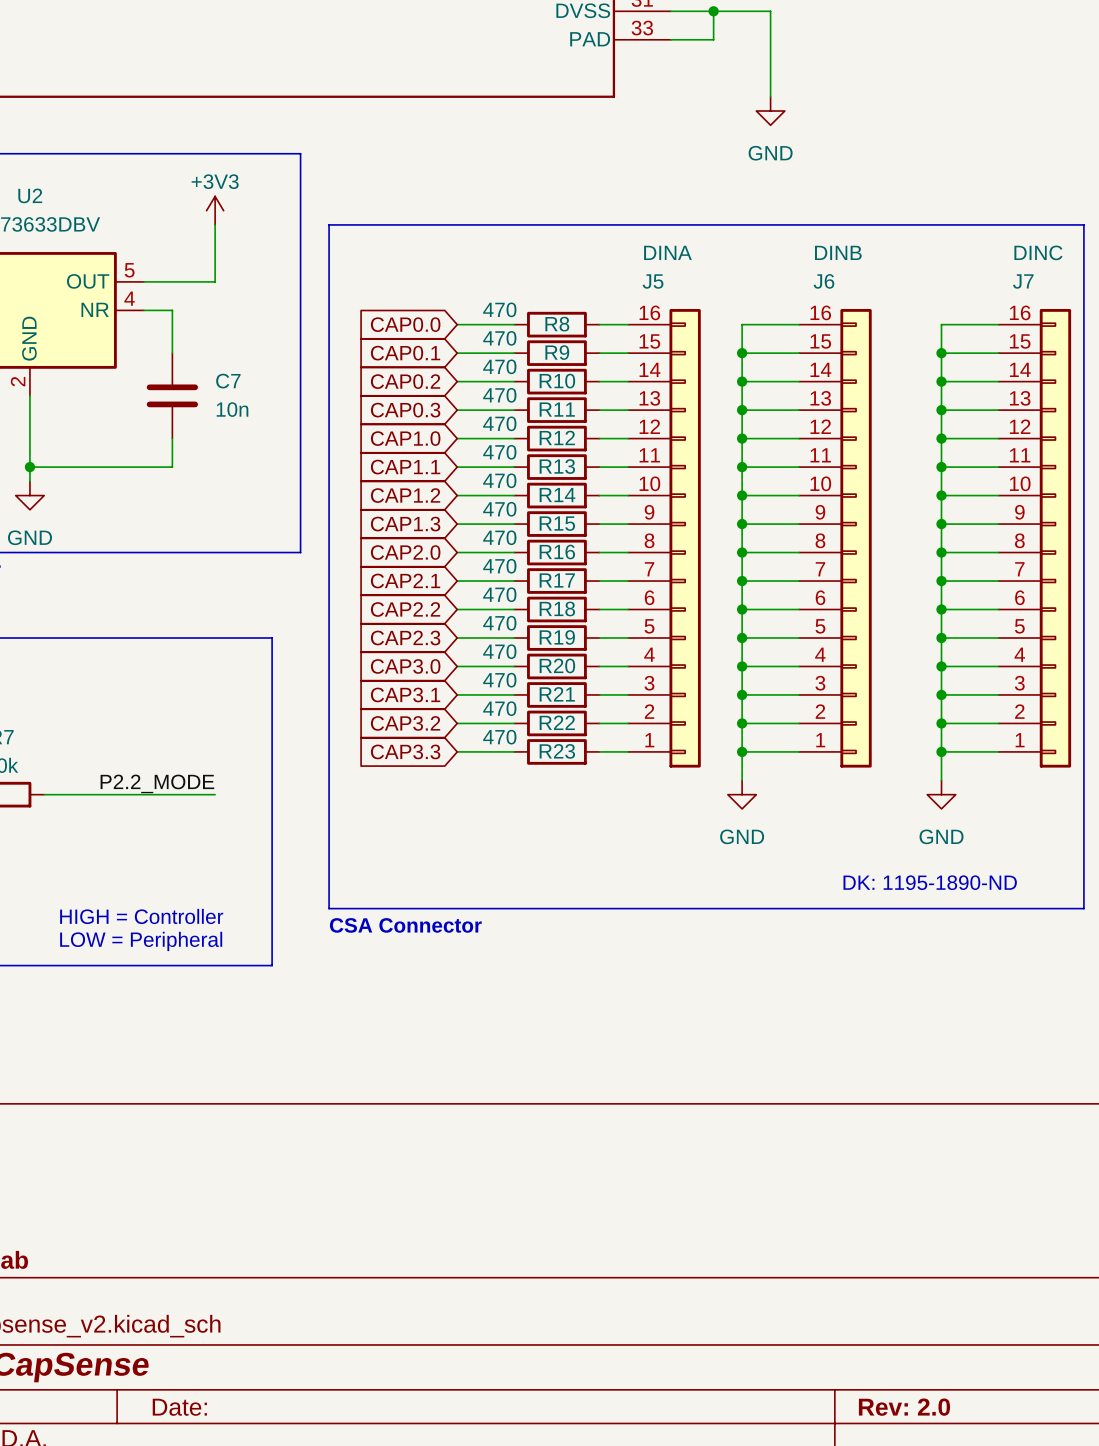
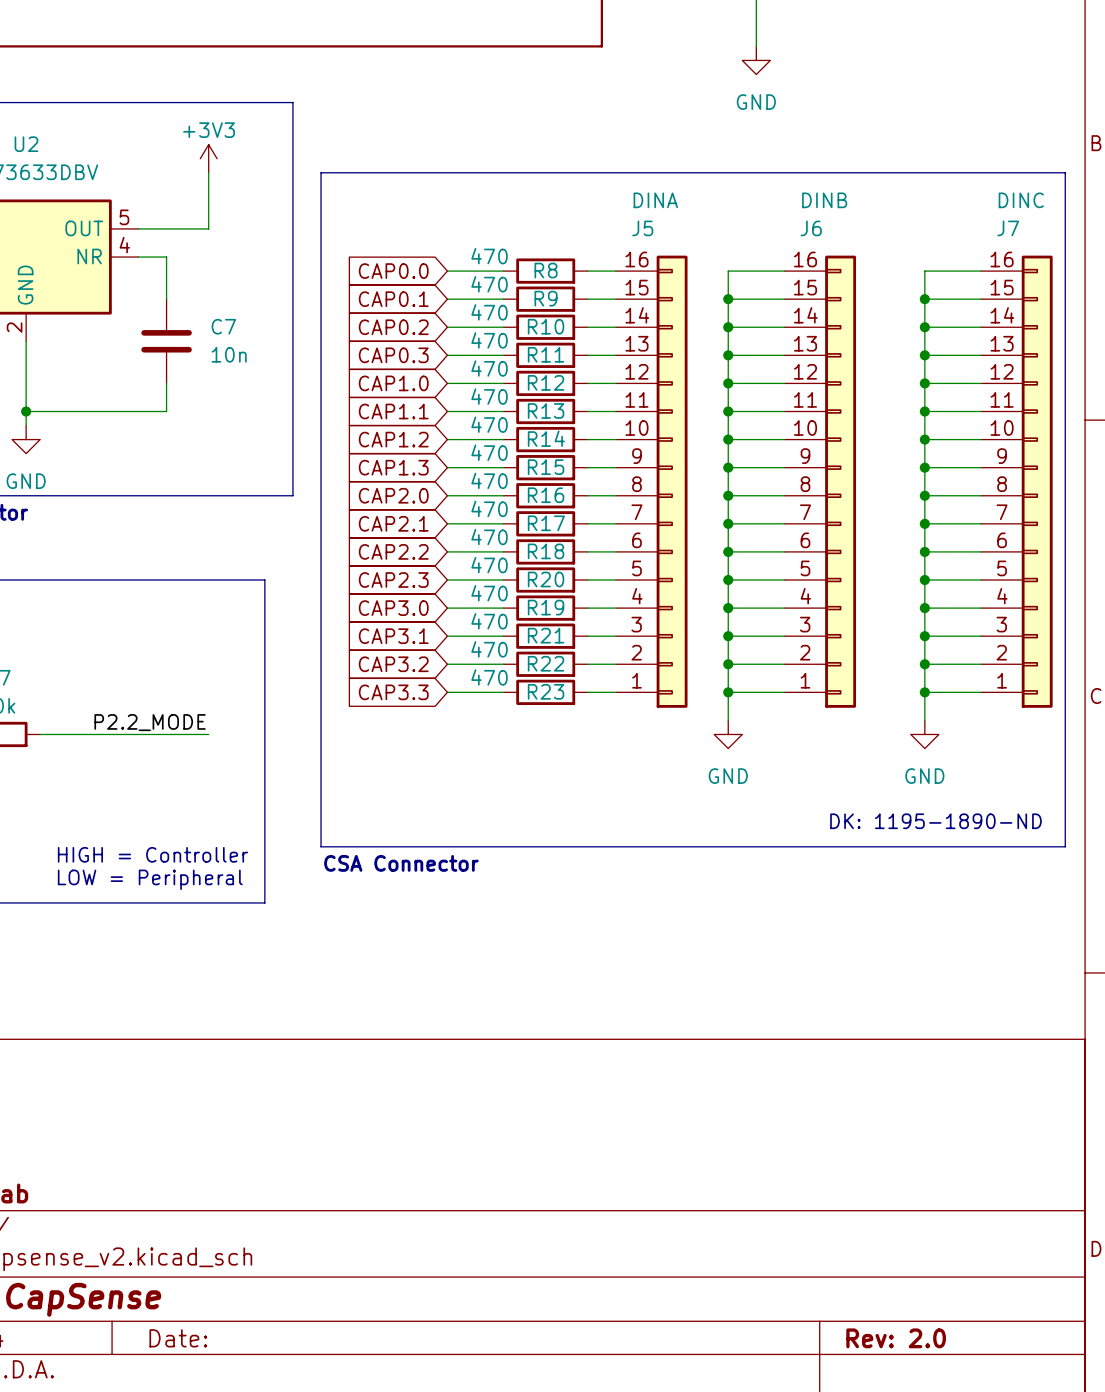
R19 name: R19 (557, 637) -> R20 (546, 579)
R20 name: R20 (557, 665) -> R19 (546, 607)

